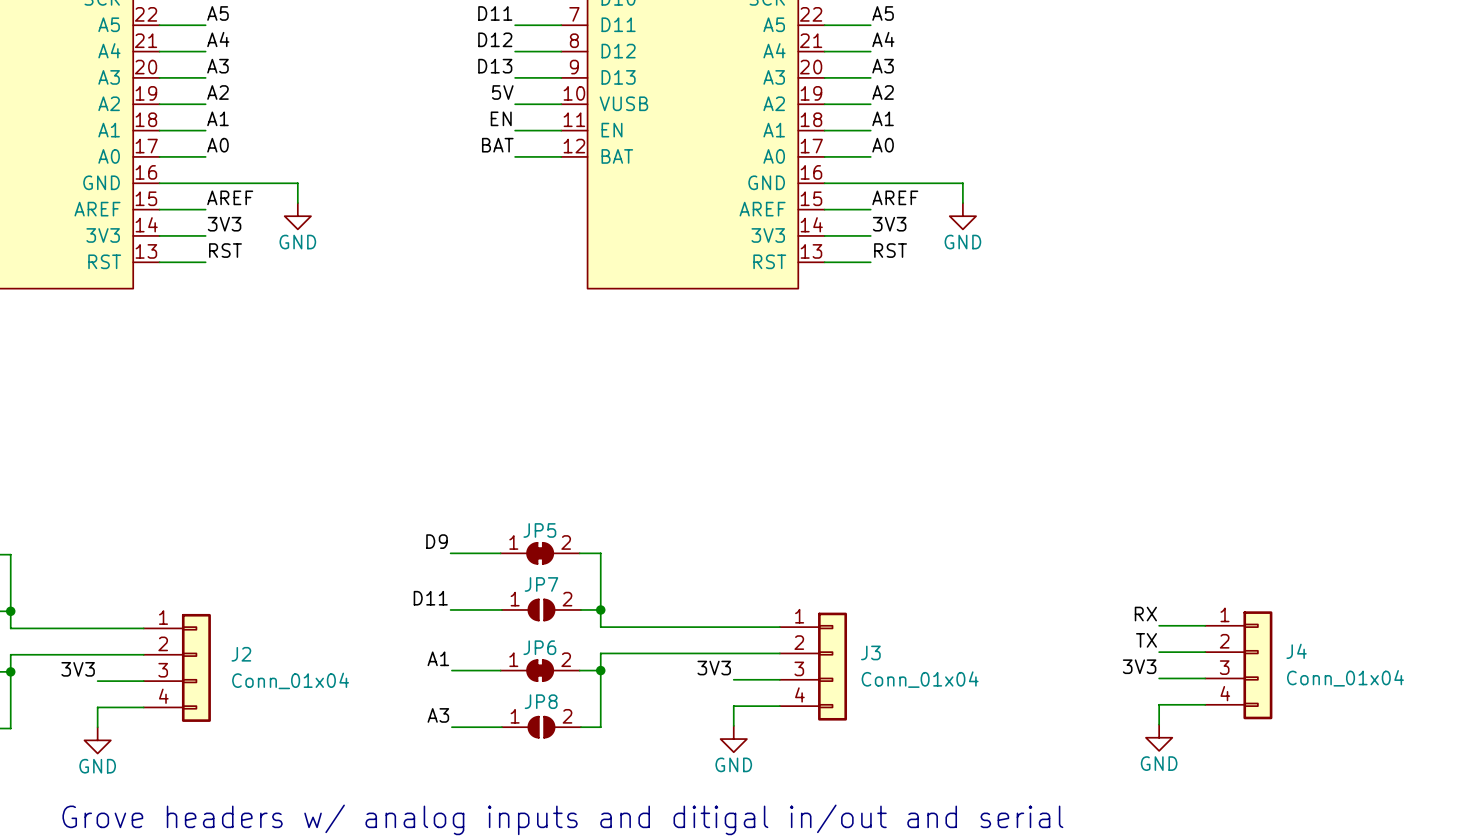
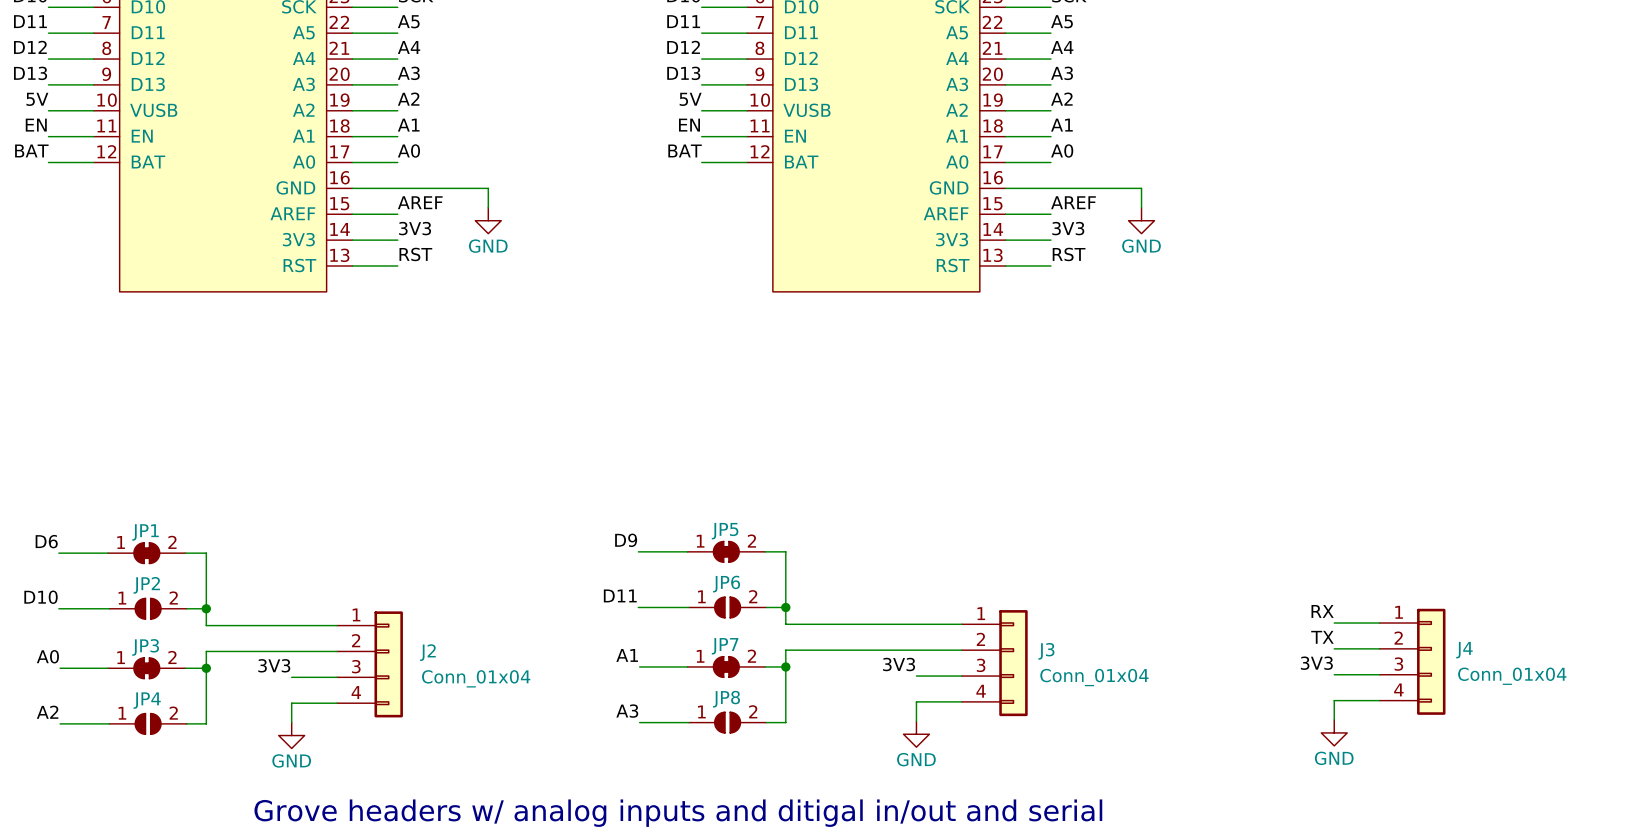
JP7 name: JP7 (541, 584) -> JP6 (726, 584)
JP6 name: JP6 (539, 647) -> JP7 (725, 646)

